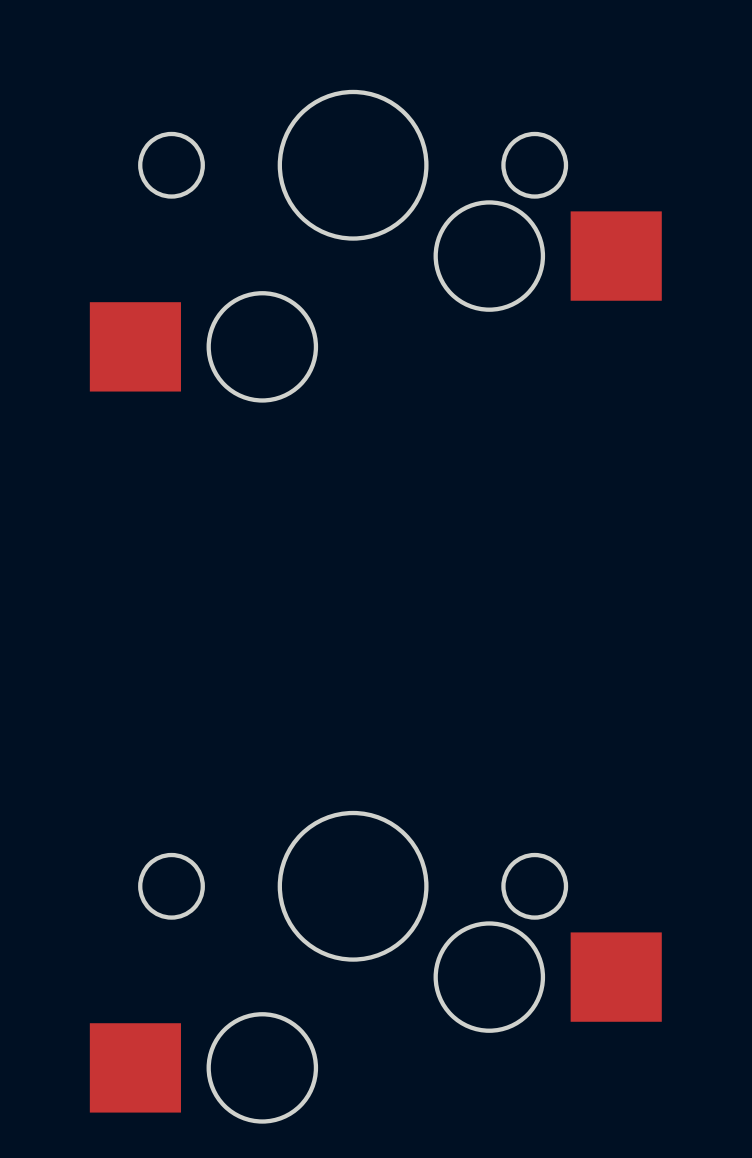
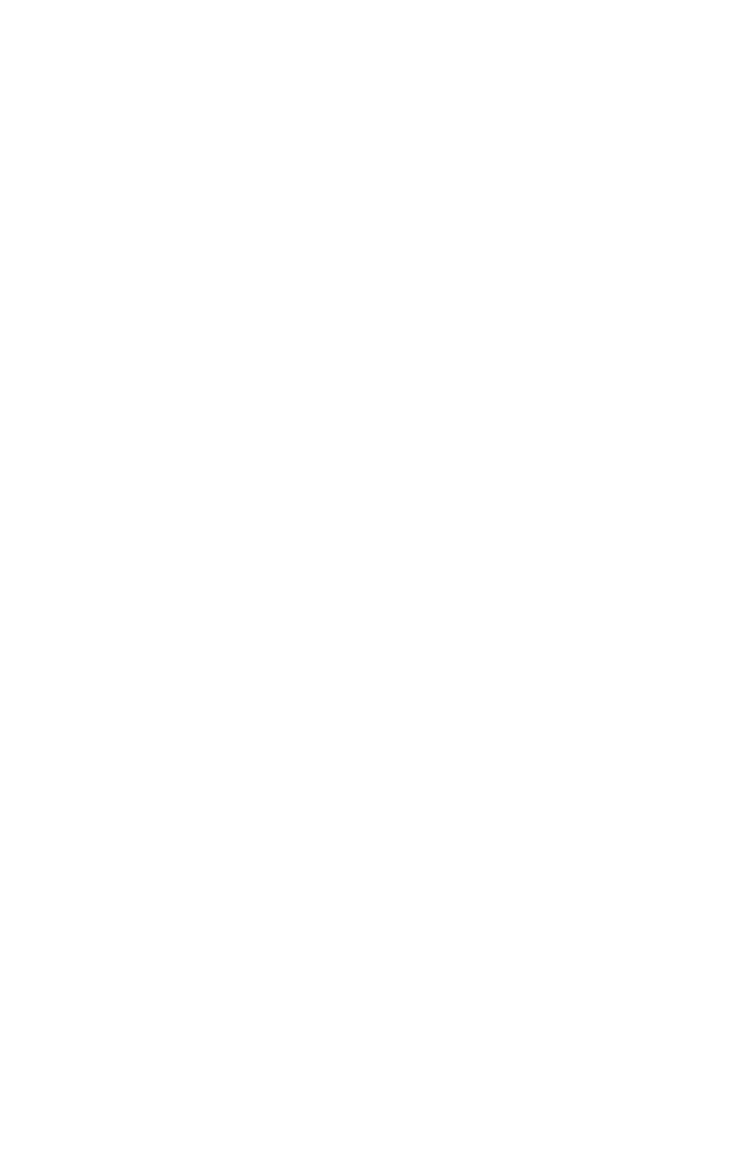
part: (375, 246) -> none
part: (375, 967) -> none

